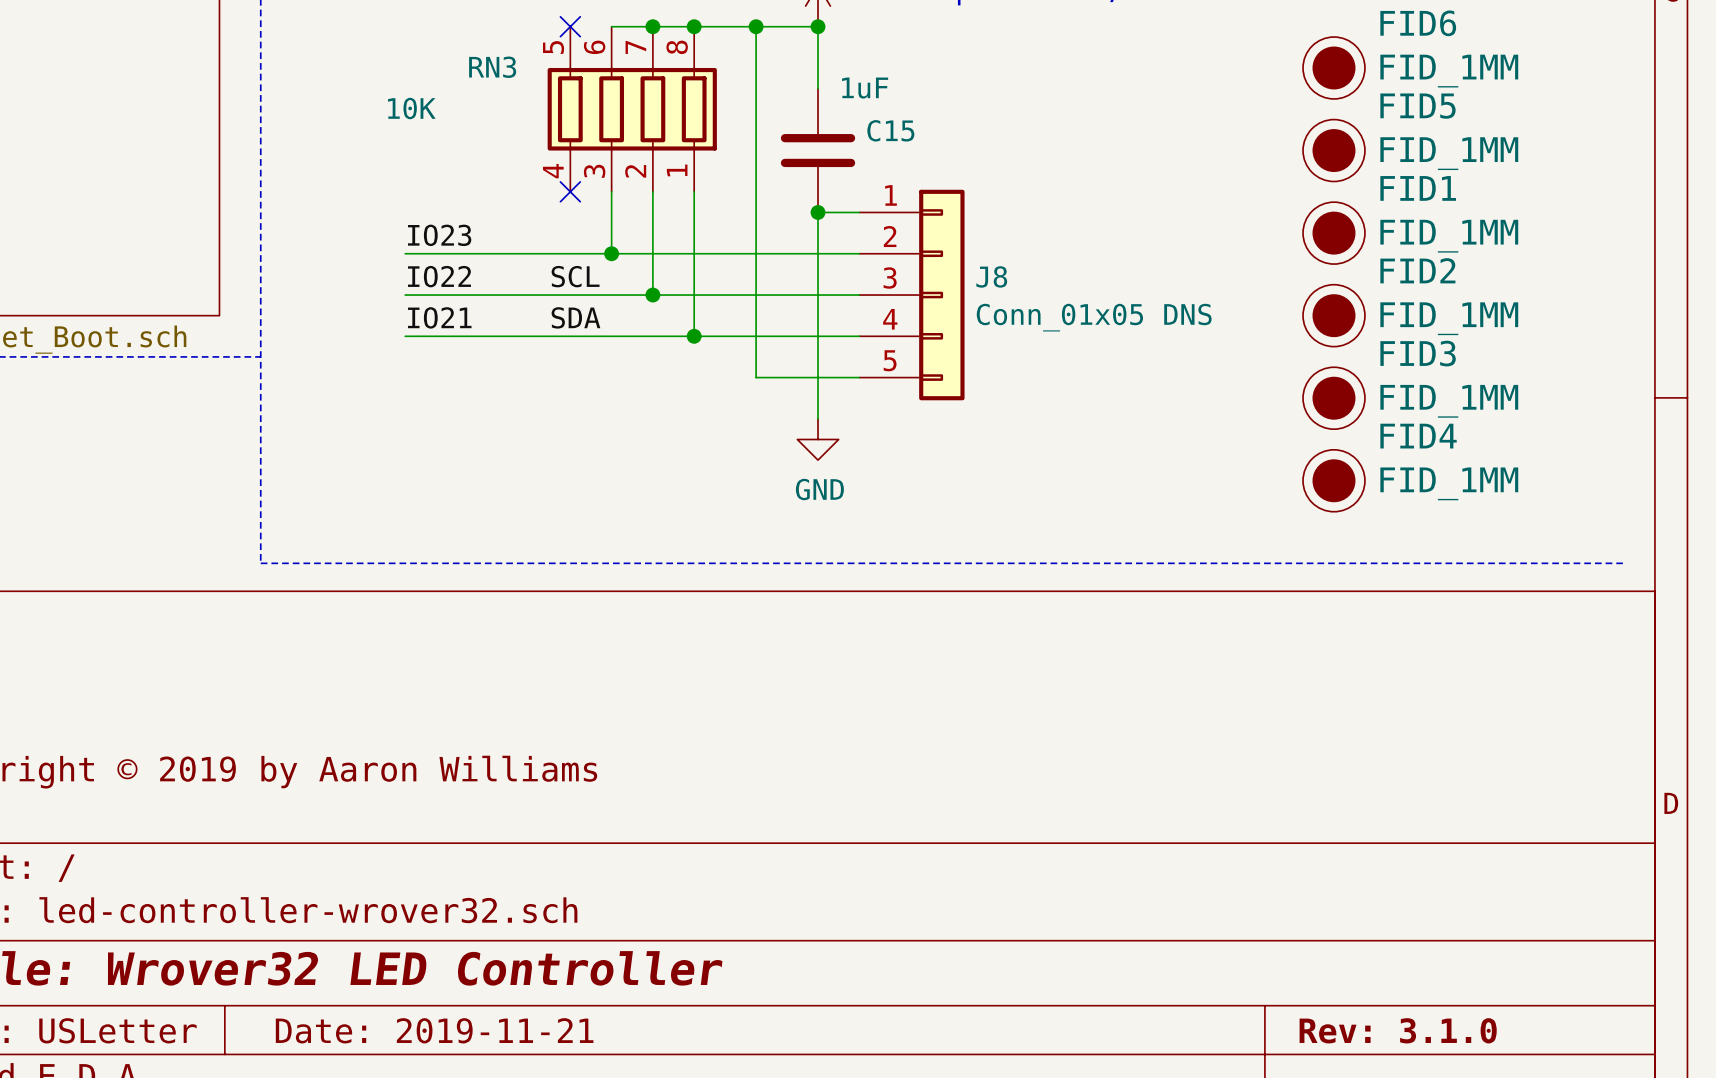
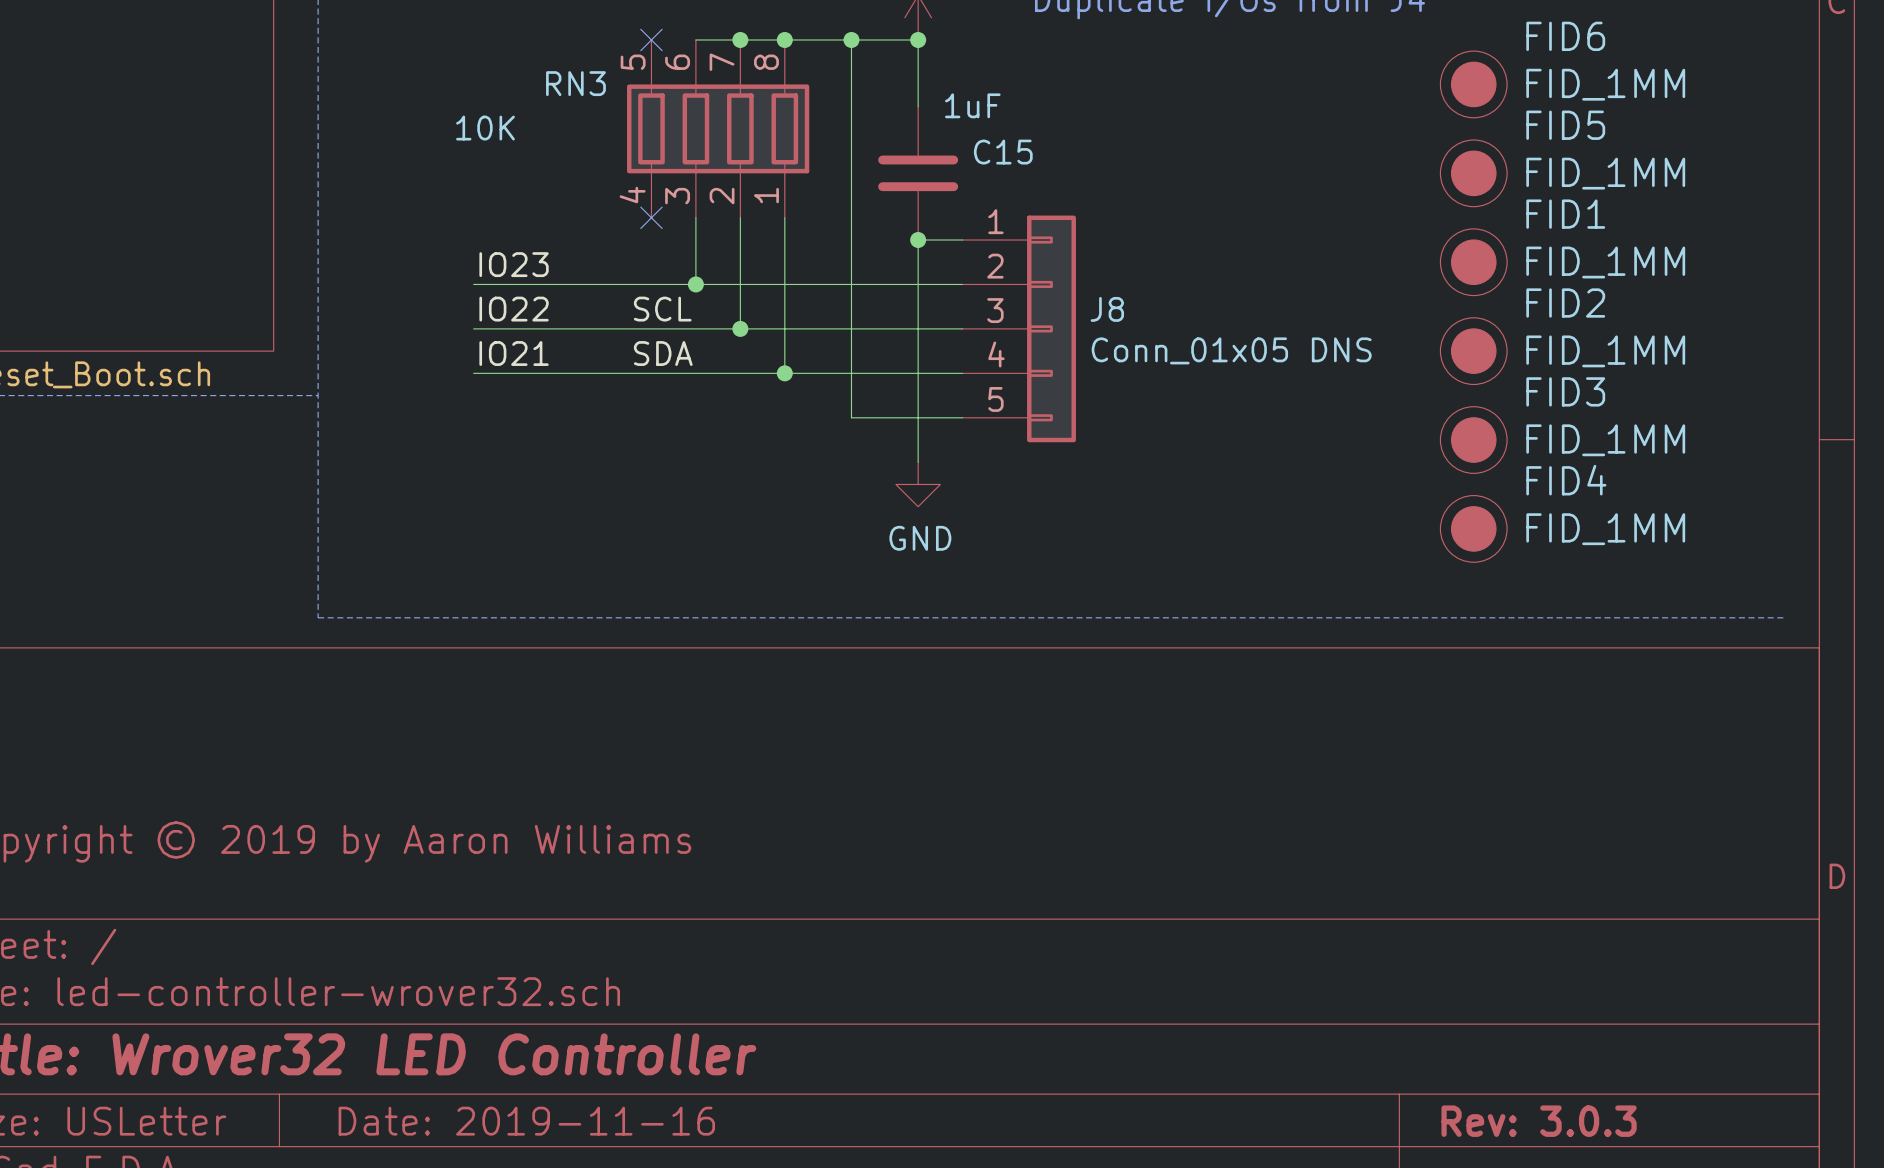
title block: Date: 2019-11-21 (434, 1030) -> Date: 2019-11-16 (526, 1121)
title block: Rev: 3.1.0 (1398, 1030) -> Rev: 3.0.3 (1539, 1121)

